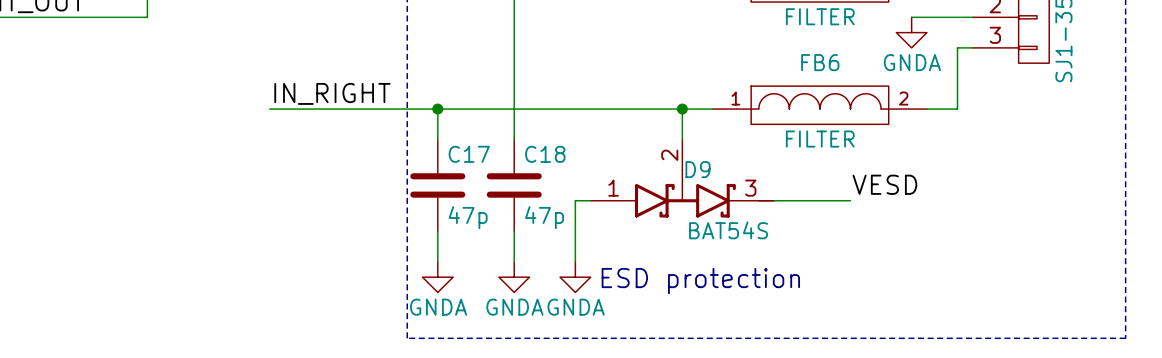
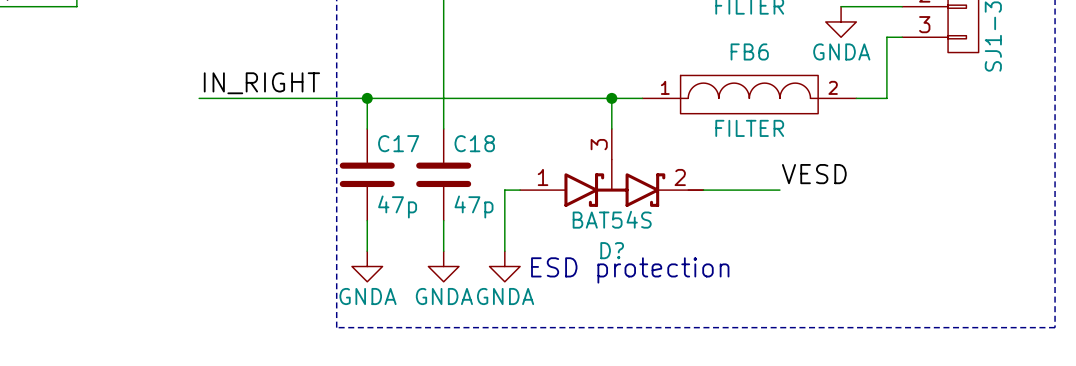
D9 pin number: 2 (669, 155) -> 3 (599, 144)
D9 name: D9 (698, 169) -> D? (612, 250)
D9 pin number: 3 (750, 188) -> 2 (680, 177)
D9 value position: BAT54S (728, 230) -> BAT54S (612, 219)

